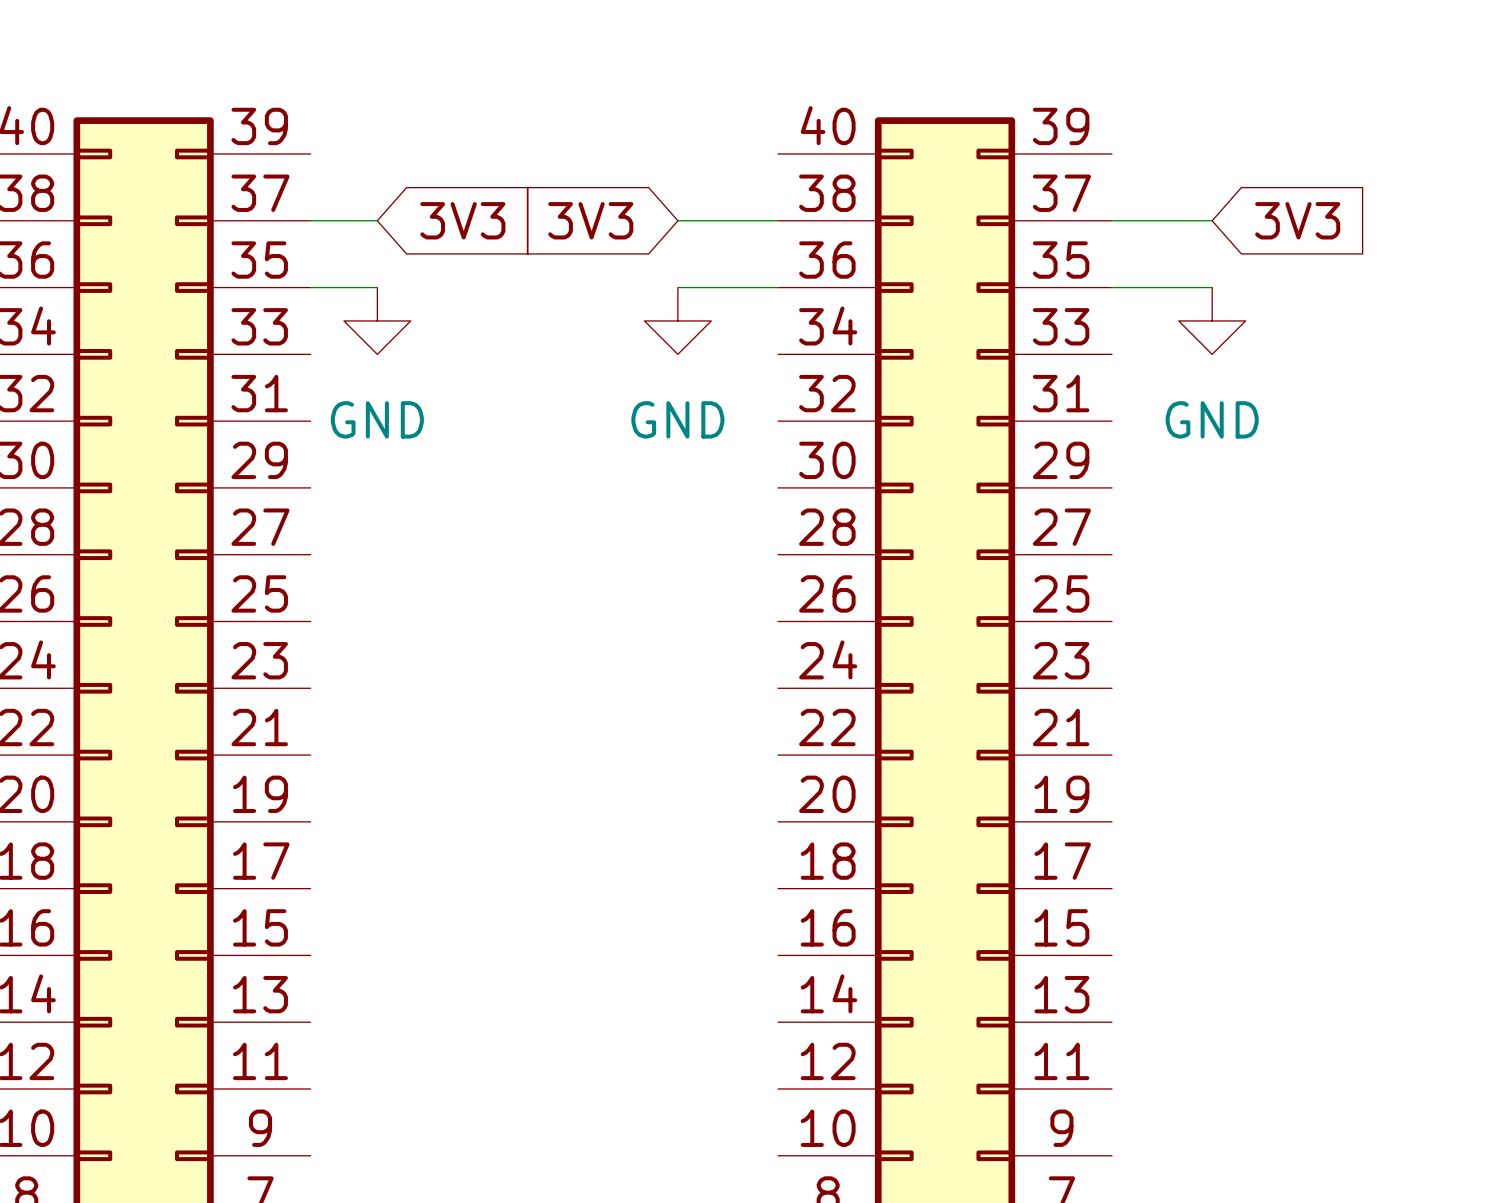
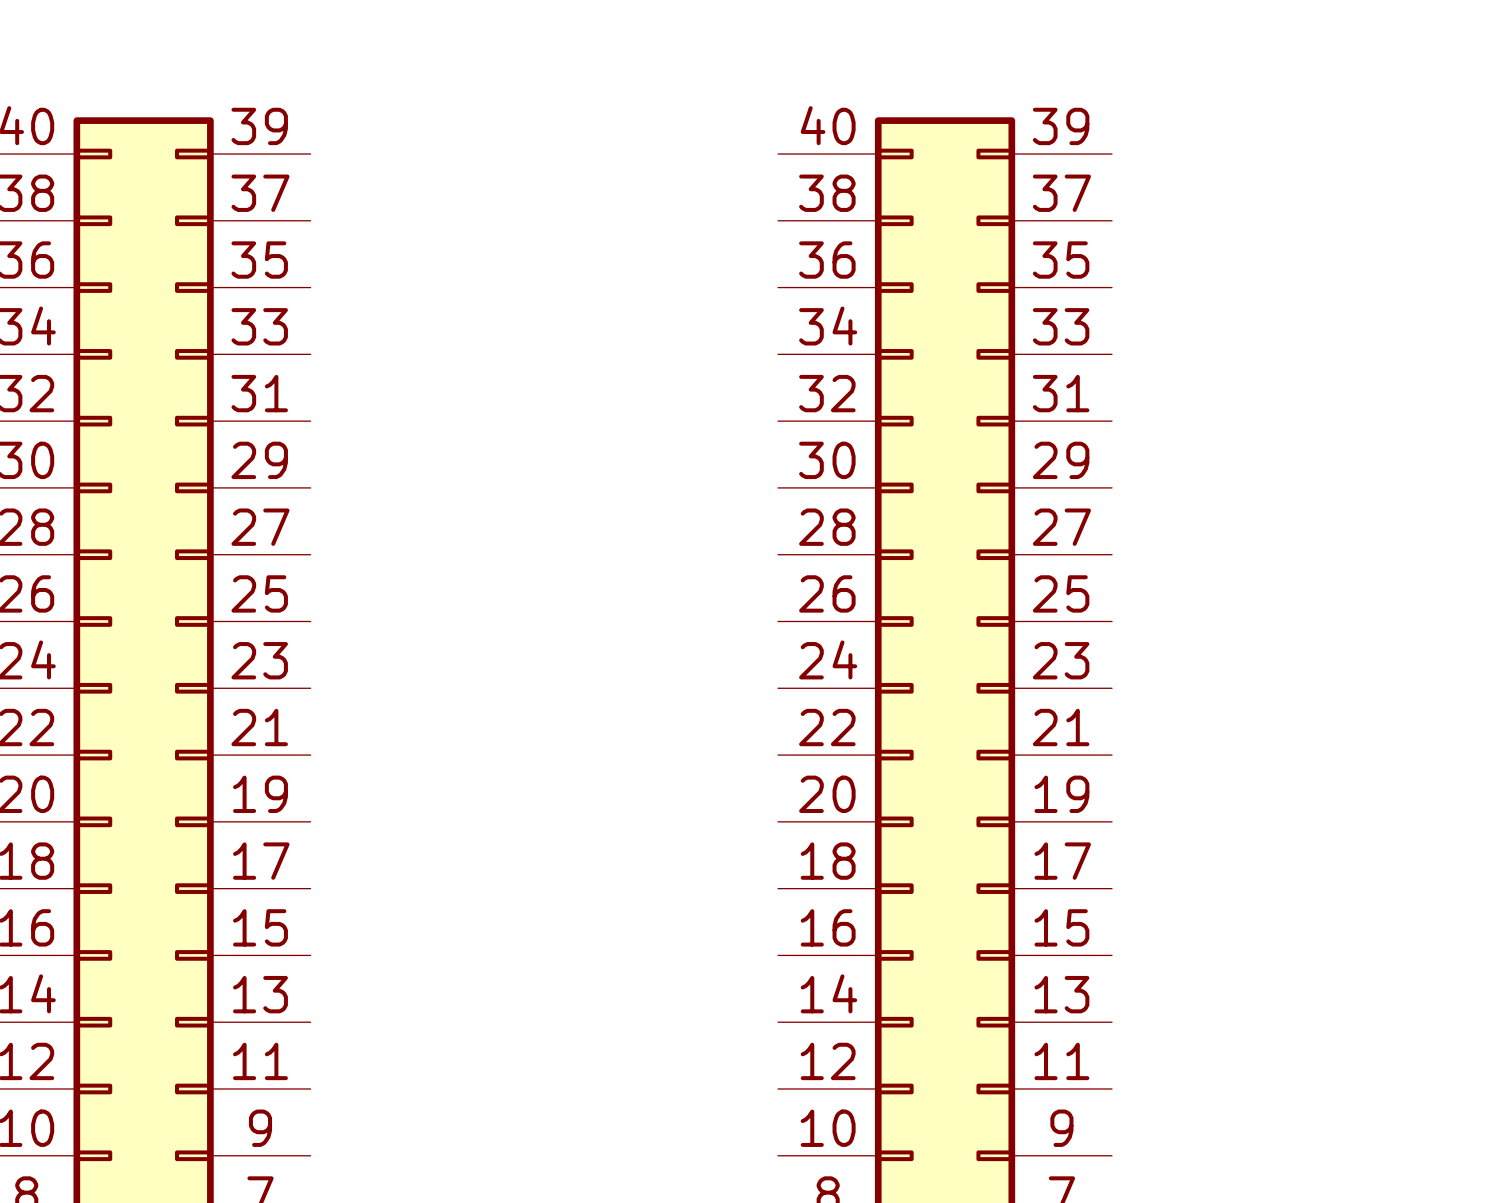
wire: (310, 220) (377, 220) -> none
global label: 3V3 (462, 220) -> none
global label: 3V3 (590, 220) -> none
wire: (677, 220) (778, 220) -> none
wire: (1112, 220) (1212, 220) -> none
global label: 3V3 (1297, 220) -> none
wire: (310, 287) (377, 287) -> none
wire: (677, 287) (778, 287) -> none
wire: (1112, 287) (1212, 287) -> none
power symbol: GND (377, 320) -> none
power symbol: GND (677, 320) -> none
power symbol: GND (1212, 320) -> none

